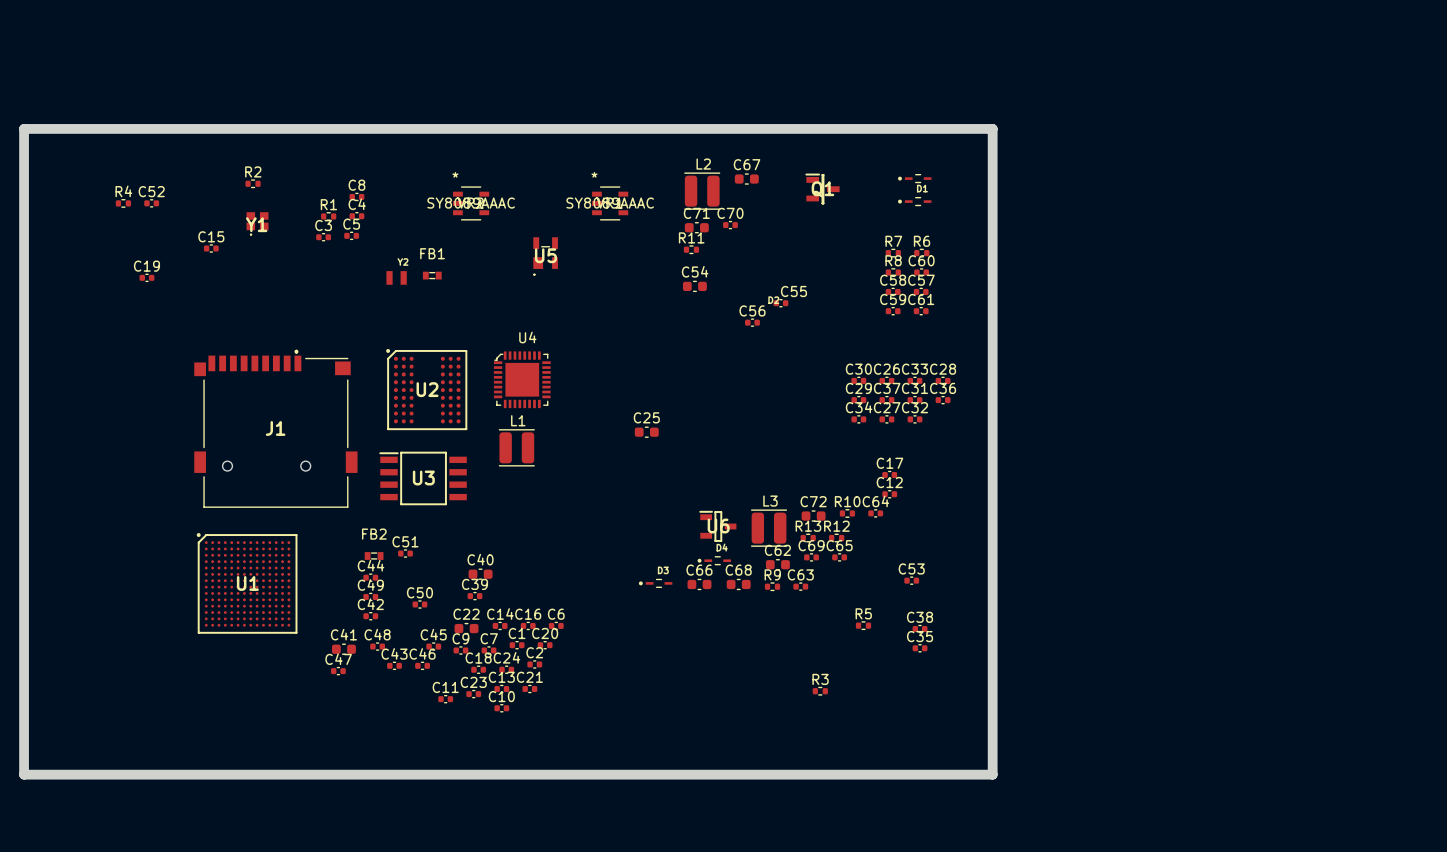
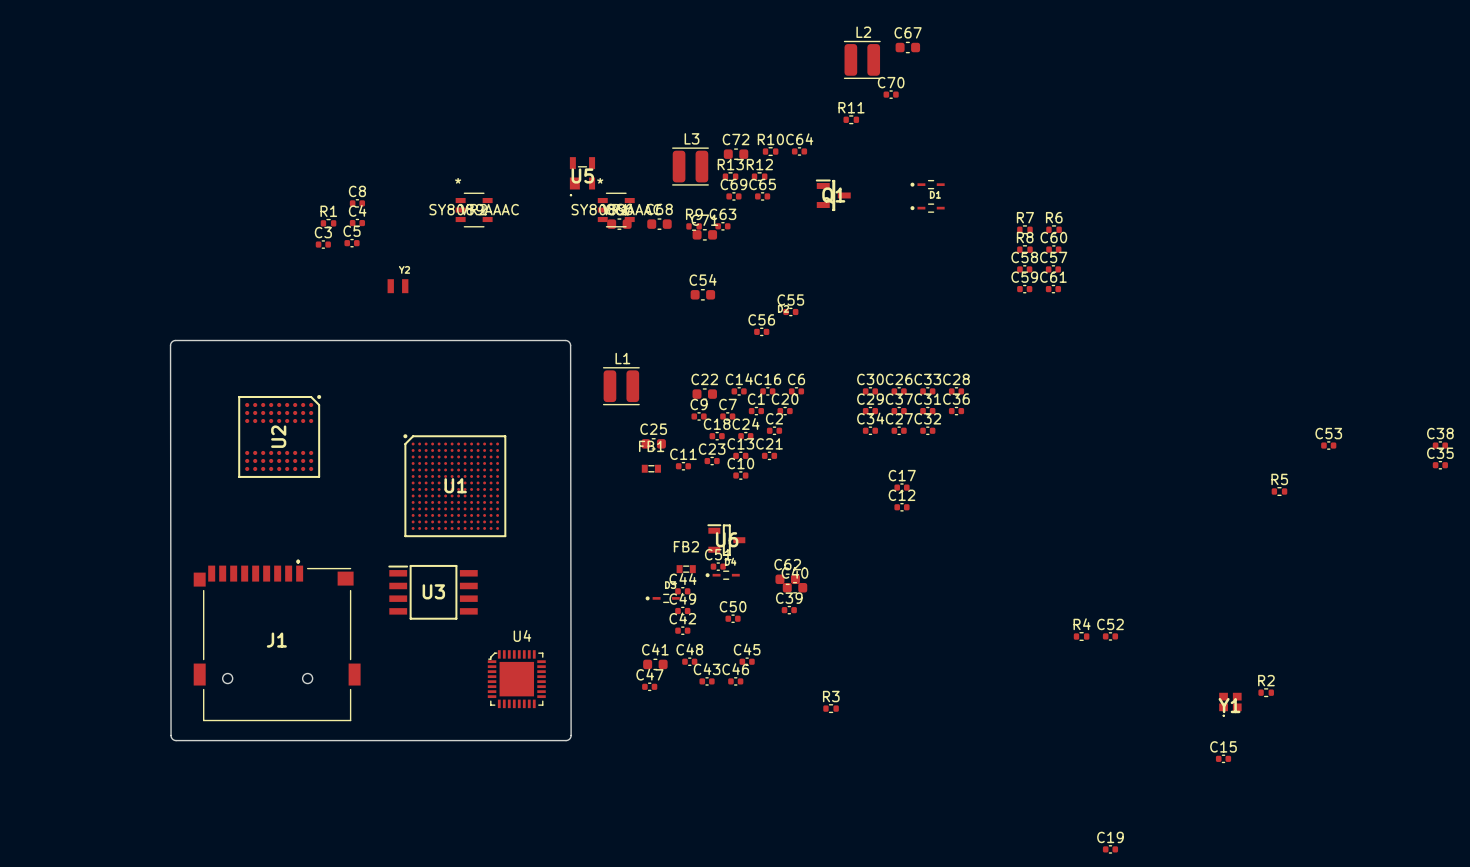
board edge: (24, 128) (992, 128) (992, 774) (24, 774) (24, 128) -> none
C67 position: (746, 179) -> (907, 47)
R2 position: (253, 183) -> (1266, 692)
L2 position: (702, 191) -> (862, 59)
R4 position: (123, 203) -> (1081, 636)
C52 position: (151, 203) -> (1110, 636)
Y1 position: (257, 223) -> (1230, 704)
C70 position: (730, 225) -> (891, 94)
C15 position: (211, 248) -> (1223, 758)
R11 position: (691, 249) -> (851, 119)
R7 position: (893, 253) -> (1024, 229)
R6 position: (921, 253) -> (1054, 229)
U5 position: (545, 256) -> (582, 176)
R8 position: (893, 272) -> (1024, 249)
C60 position: (921, 272) -> (1053, 249)
FB1 position: (432, 275) -> (651, 468)
C19 position: (146, 277) -> (1110, 849)
C55 name position: C55 (793, 291) -> C55 (790, 300)
C58 position: (893, 291) -> (1024, 269)
C57 position: (921, 291) -> (1053, 269)
C59 position: (893, 311) -> (1024, 289)
C61 position: (921, 311) -> (1053, 289)
board edge: none -> (175, 340) (569, 341) (569, 739) (172, 739) (170, 345) (175, 340)
U4 position: (522, 379) -> (516, 679)
U2 rotation: 0° (426, 389) -> 90° clockwise (279, 436)
U2 position: (426, 389) -> (279, 436)
J1 position: (275, 428) -> (277, 640)
L1 position: (516, 447) -> (621, 386)
U3 position: (423, 478) -> (433, 592)
R10 position: (847, 513) -> (770, 151)
C64 position: (875, 513) -> (799, 151)
C72 position: (813, 516) -> (736, 154)
L3 position: (769, 528) -> (690, 166)
R13 position: (808, 538) -> (730, 176)
R12 position: (836, 538) -> (759, 176)
C51 position: (405, 553) -> (718, 566)
FB2 position: (374, 555) -> (686, 569)
C69 position: (811, 557) -> (733, 196)
C65 position: (839, 557) -> (762, 196)
C40 position: (480, 574) -> (795, 587)
C44 position: (370, 577) -> (682, 591)
C53 position: (911, 580) -> (1328, 445)
U1 position: (247, 583) -> (454, 485)
C66 position: (699, 584) -> (619, 224)
C68 position: (738, 584) -> (659, 224)
R9 position: (772, 586) -> (694, 226)
C63 position: (800, 586) -> (722, 226)
C49 position: (370, 596) -> (682, 611)
C39 position: (474, 596) -> (789, 610)
C50 position: (419, 604) -> (733, 618)
C42 position: (370, 616) -> (682, 630)
C14 position: (500, 625) -> (739, 391)
C16 position: (528, 625) -> (767, 391)
C6 position: (556, 625) -> (796, 391)
R5 position: (863, 625) -> (1279, 491)
C22 position: (466, 628) -> (704, 394)
C38 position: (920, 629) -> (1440, 445)
C1 position: (517, 645) -> (756, 411)
C20 position: (545, 645) -> (785, 411)
C48 position: (377, 646) -> (689, 661)
C45 position: (433, 646) -> (747, 661)
C35 position: (920, 648) -> (1440, 465)
C41 position: (343, 649) -> (655, 664)
C9 position: (460, 650) -> (699, 416)
C7 position: (489, 650) -> (727, 416)
C2 position: (534, 664) -> (774, 430)
C43 position: (394, 665) -> (707, 681)
C46 position: (422, 665) -> (735, 681)
C18 position: (478, 669) -> (717, 436)
C24 position: (506, 669) -> (745, 436)
C47 position: (338, 671) -> (649, 686)
C13 position: (501, 689) -> (740, 455)
C21 position: (529, 689) -> (769, 455)
C23 position: (473, 694) -> (712, 461)
C11 position: (445, 699) -> (683, 466)
C10 position: (501, 708) -> (740, 475)

